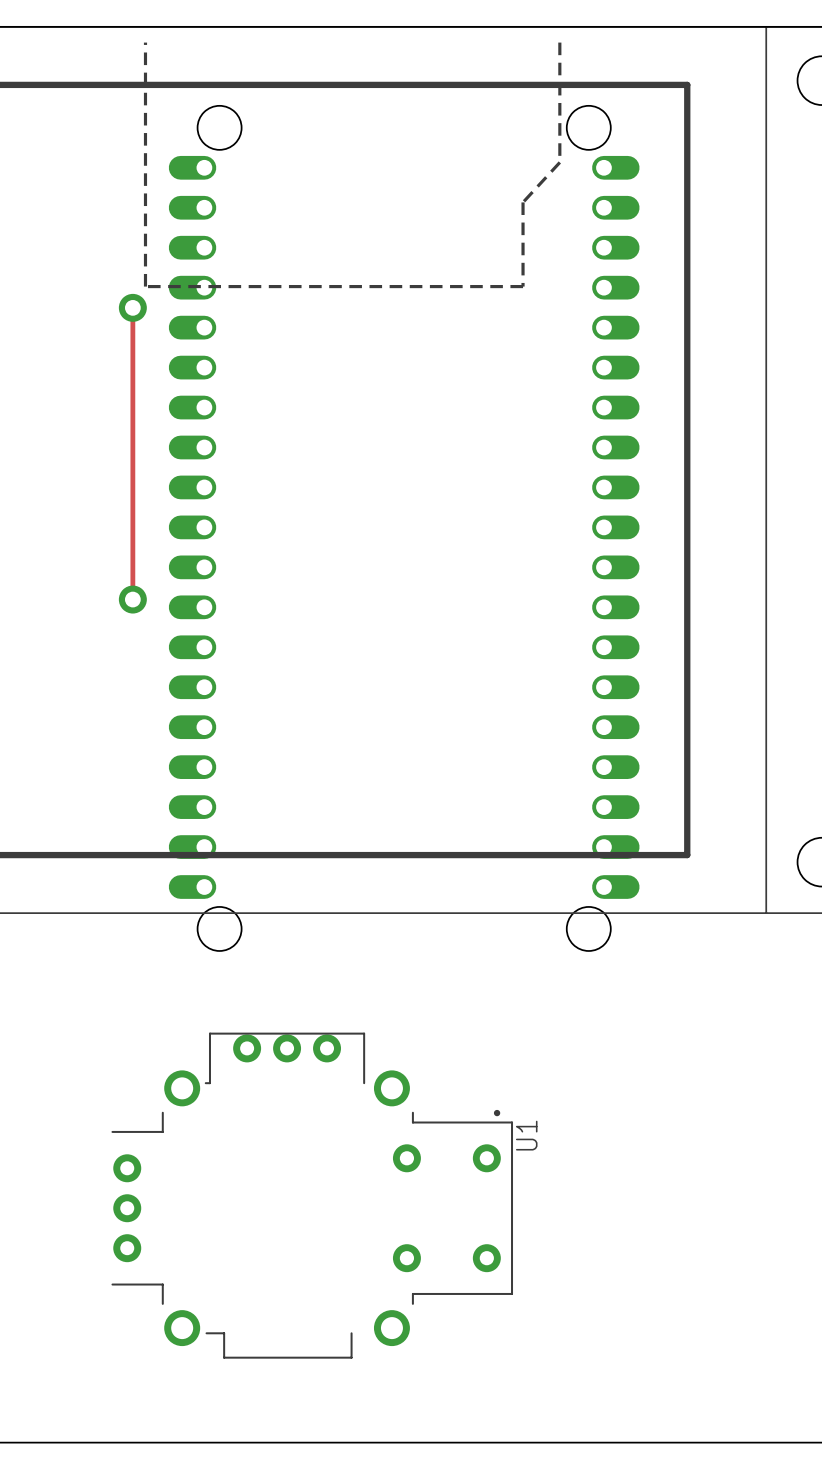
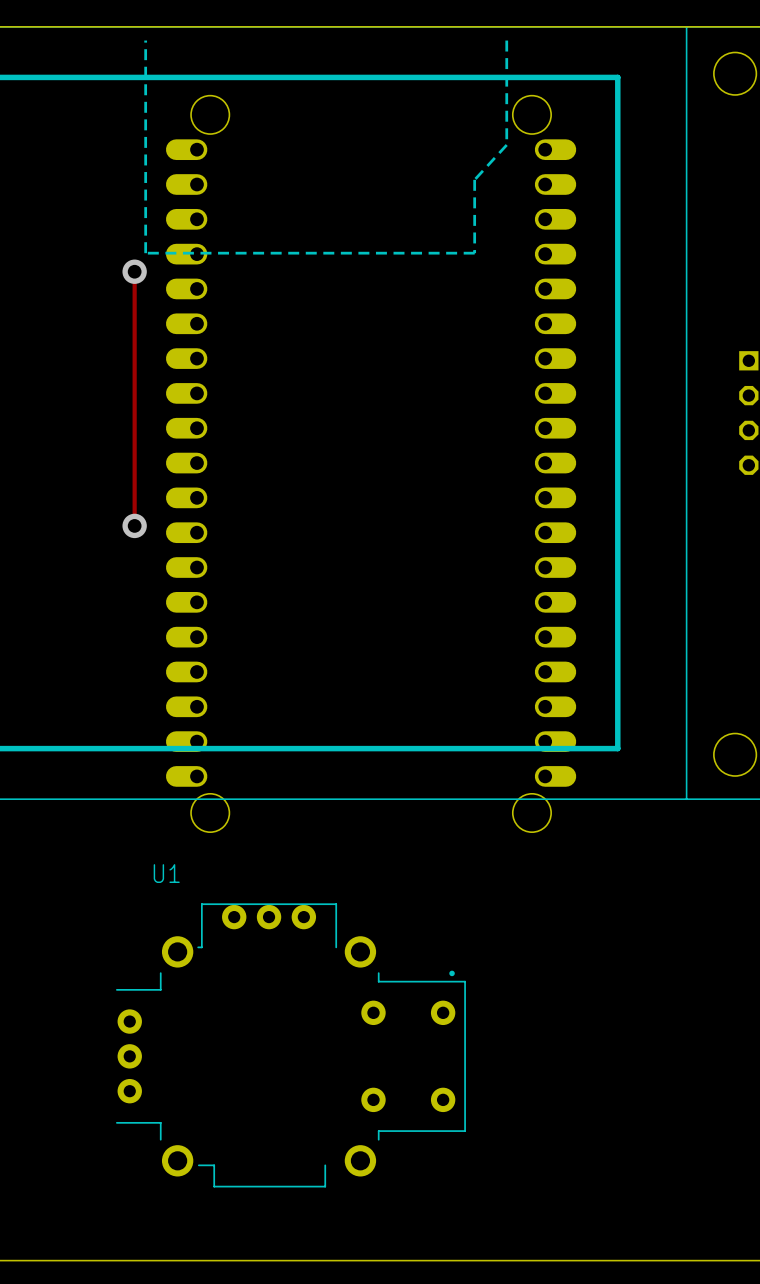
U1 name rotation: 0° (526, 1135) -> 90° clockwise (166, 873)
U1 name position: U1 (526, 1135) -> U1 (166, 873)

